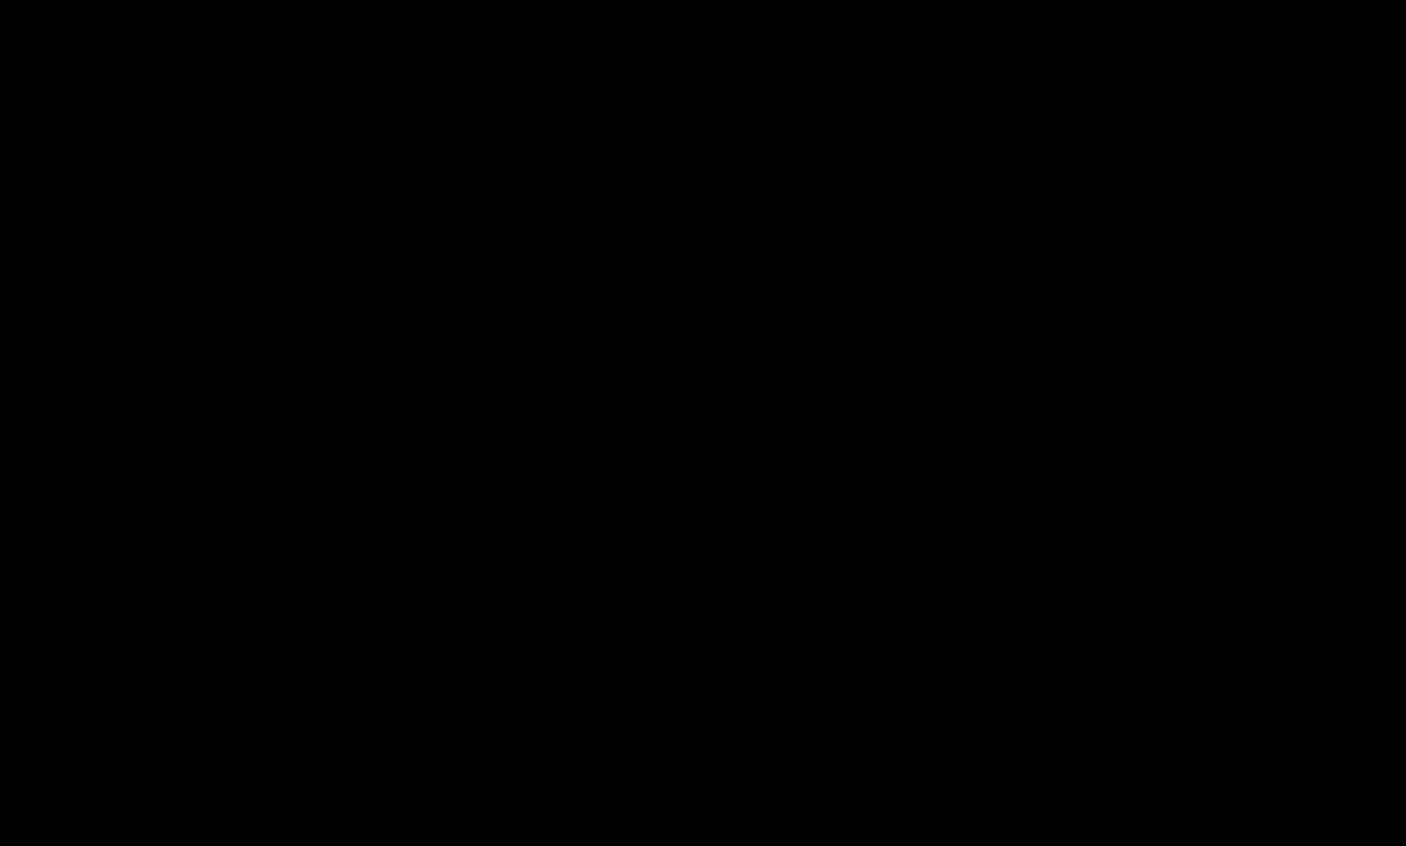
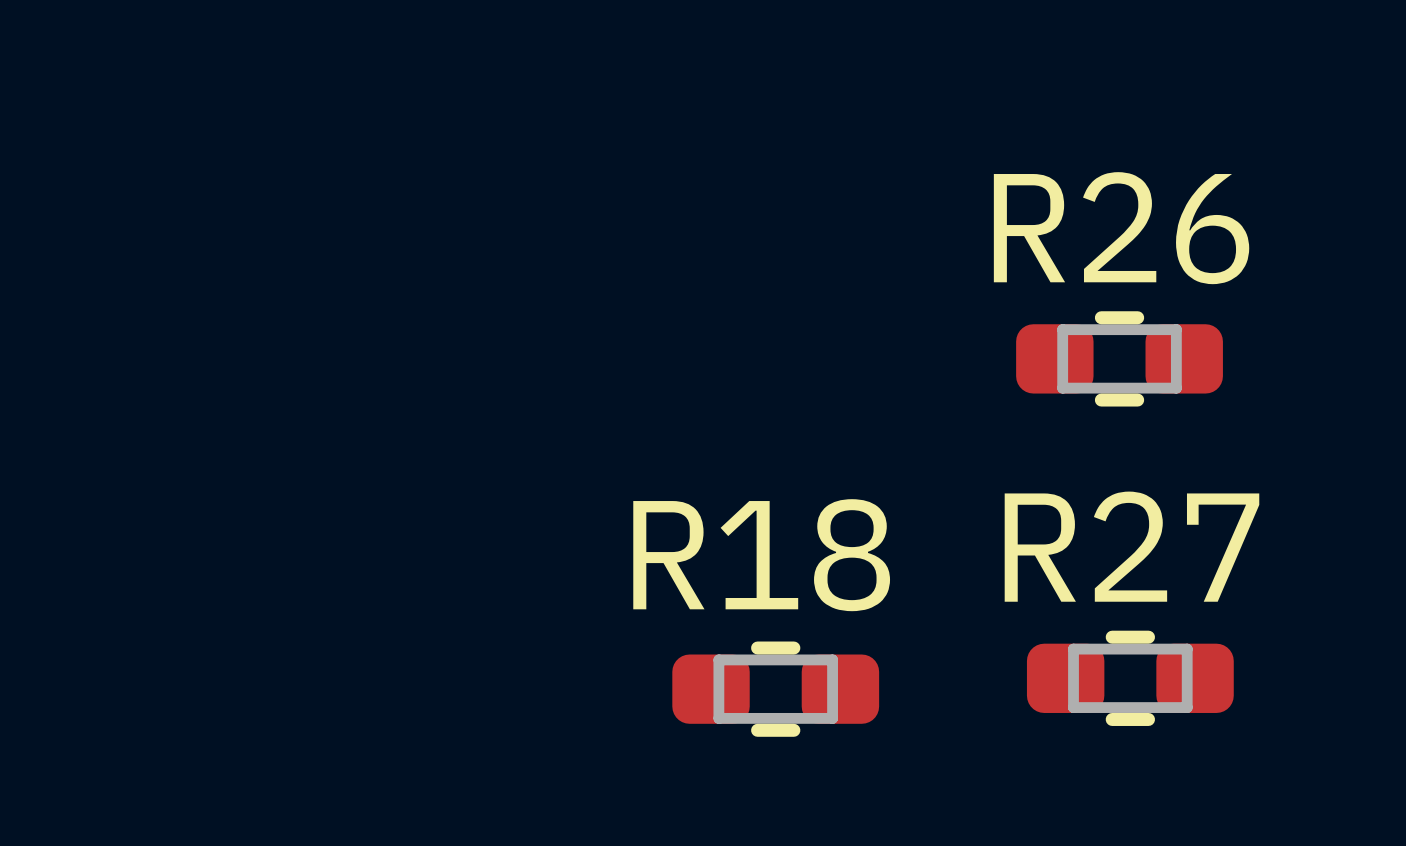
R26: none -> (1119, 358)
R27: none -> (1130, 678)
R18: none -> (775, 689)

